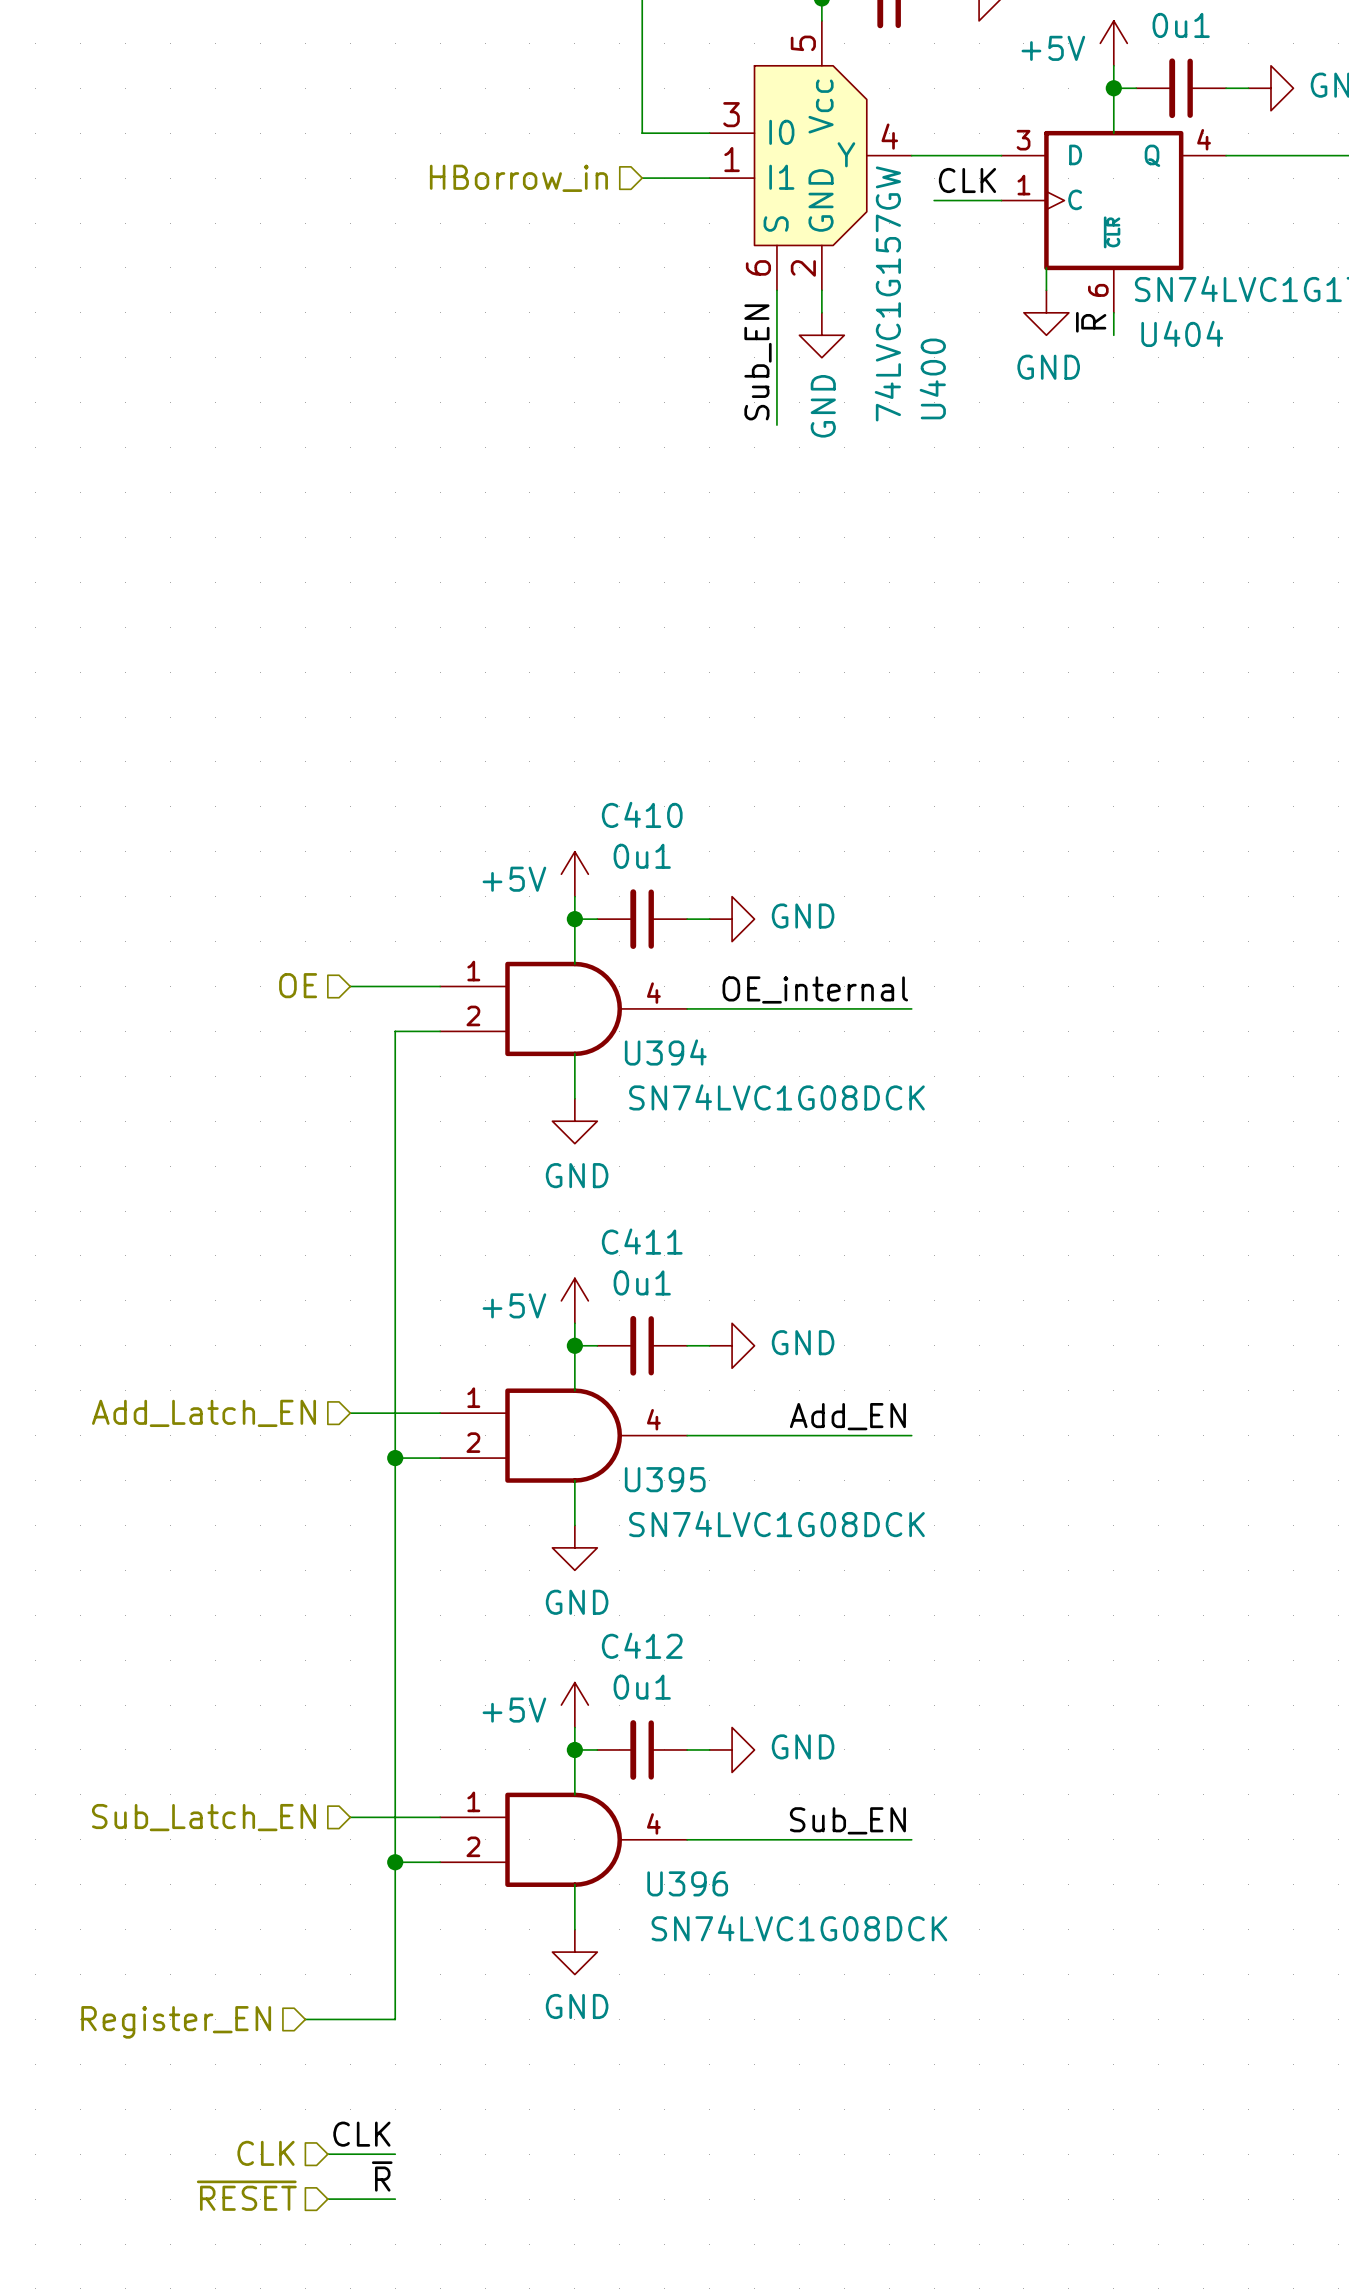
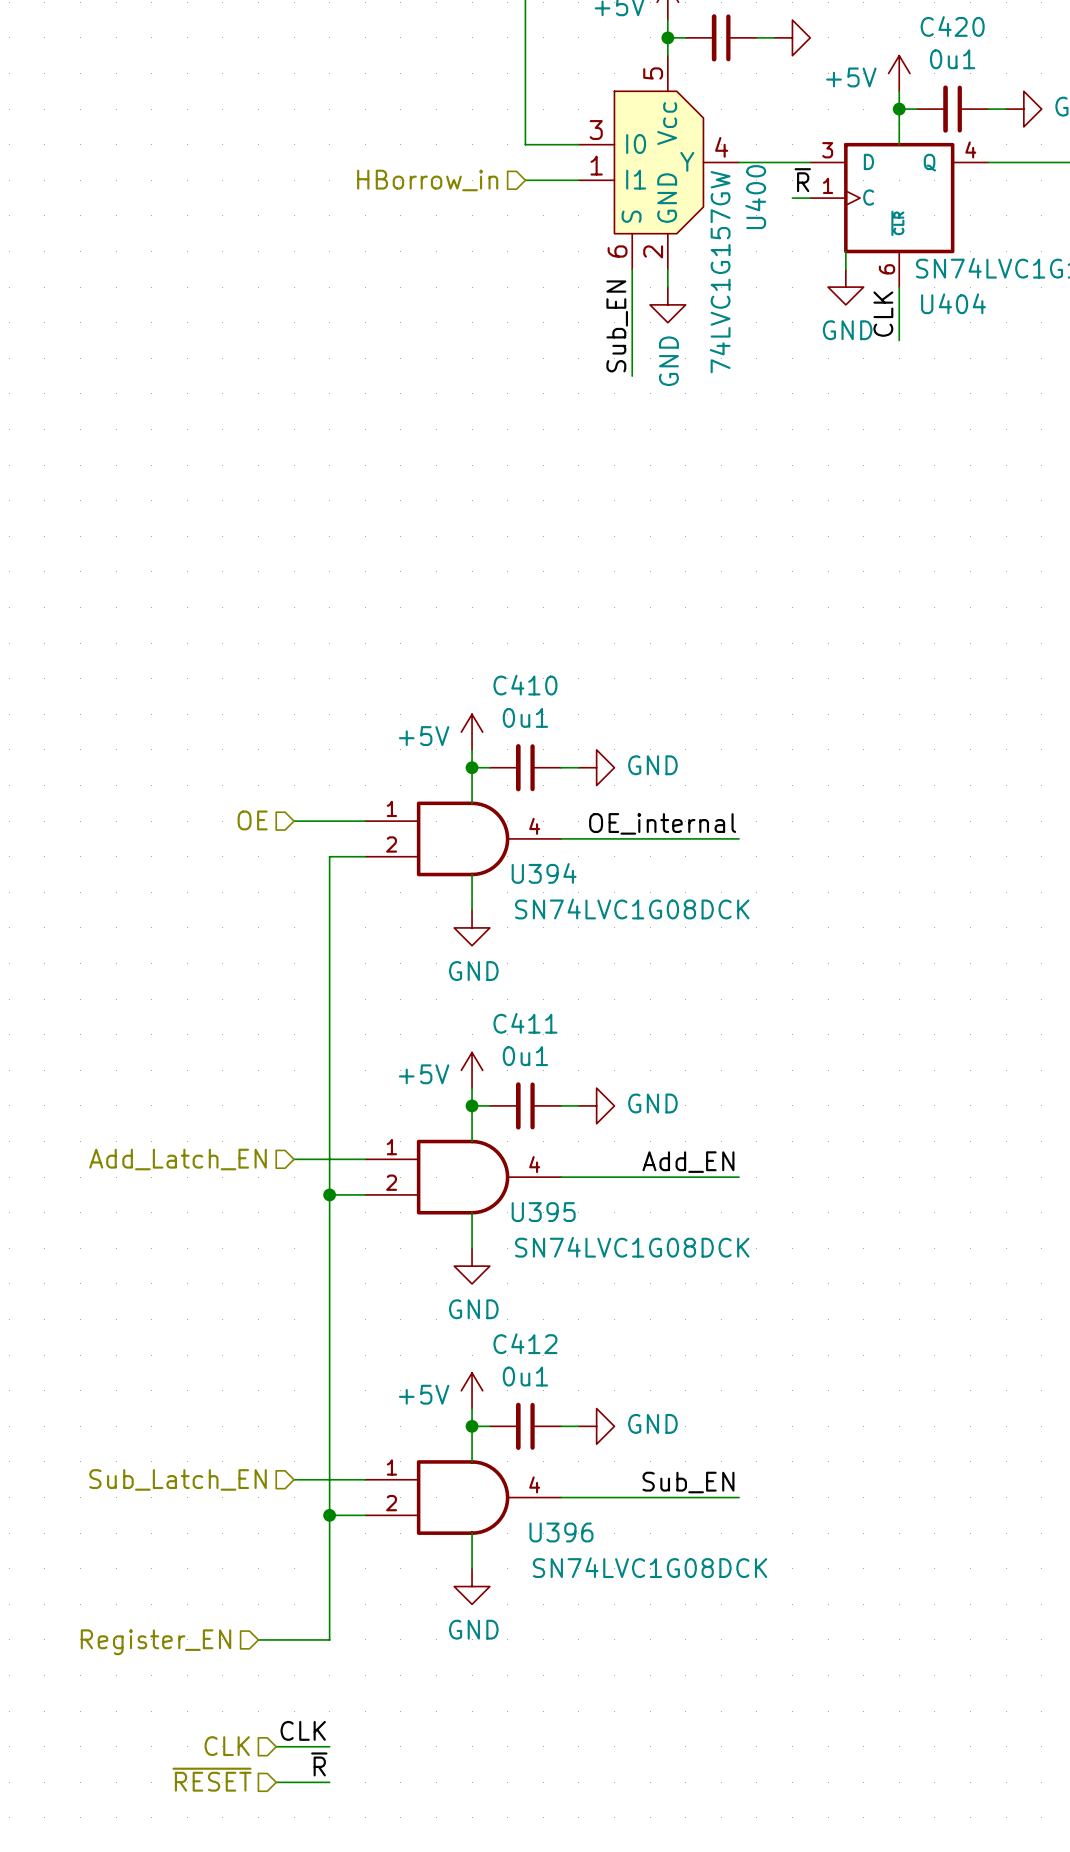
label rotation: 0° (967, 180) -> 90° counterclockwise (883, 314)
label position: CLK (967, 180) -> CLK (883, 314)
wire: (934, 200) (979, 200) -> none
label rotation: 0° (1091, 322) -> 90° clockwise (802, 180)
label position: ~{R} (1091, 322) -> ~{R} (802, 180)
wire: none -> (899, 304) (899, 340)
U400 name position: U400 (932, 378) -> U400 (755, 197)

